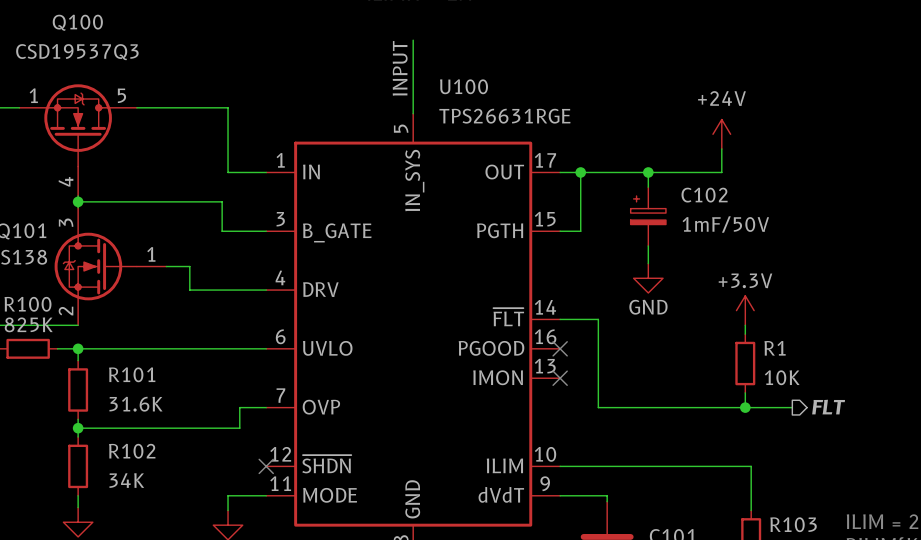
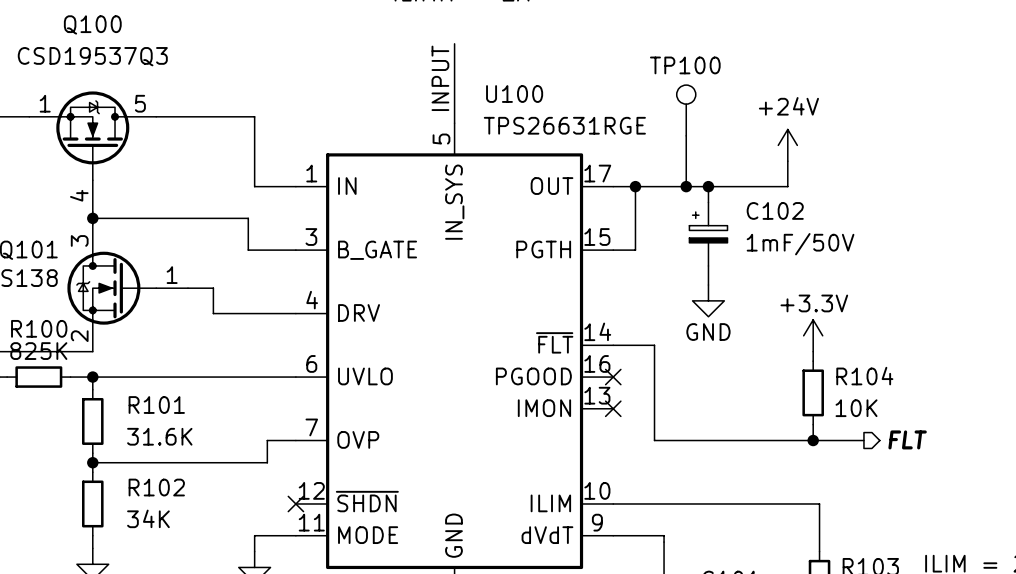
TP100: none -> (686, 110)
wire: none -> (686, 135) (686, 186)
junction: none -> (686, 186)
R1 name: R1 (775, 348) -> R104 (864, 376)

